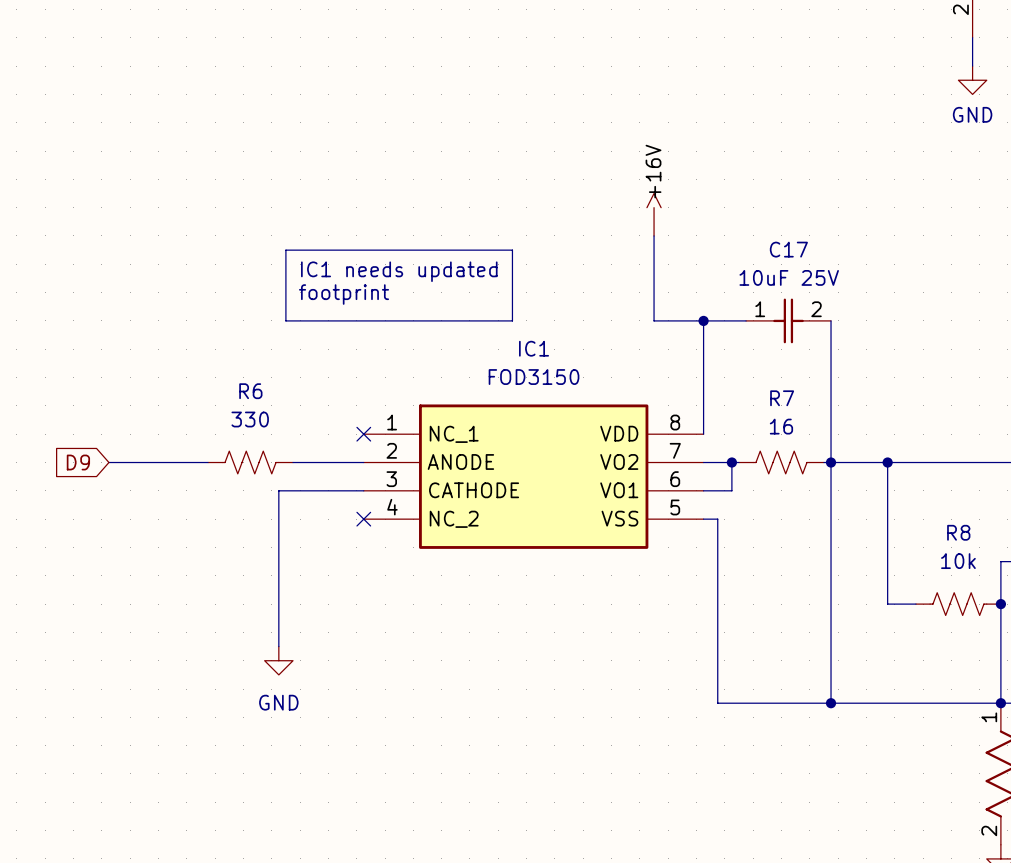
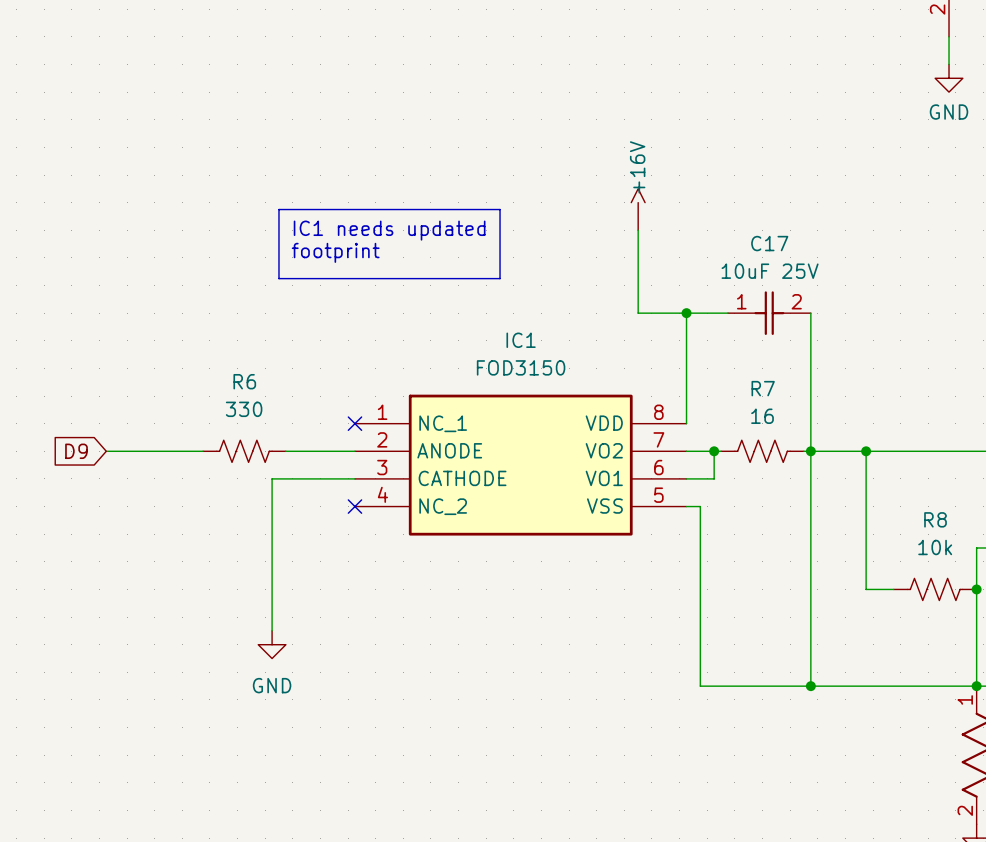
line: (285, 250) (512, 250) -> (278, 244) (278, 209) (500, 209) (500, 244)
text position: IC1 needs updated (399, 271) -> IC1 needs updated (389, 230)
line: (285, 285) (285, 320) (512, 320) (512, 285) -> (278, 278) (500, 278)
text position: footprint (344, 294) -> footprint (335, 252)

